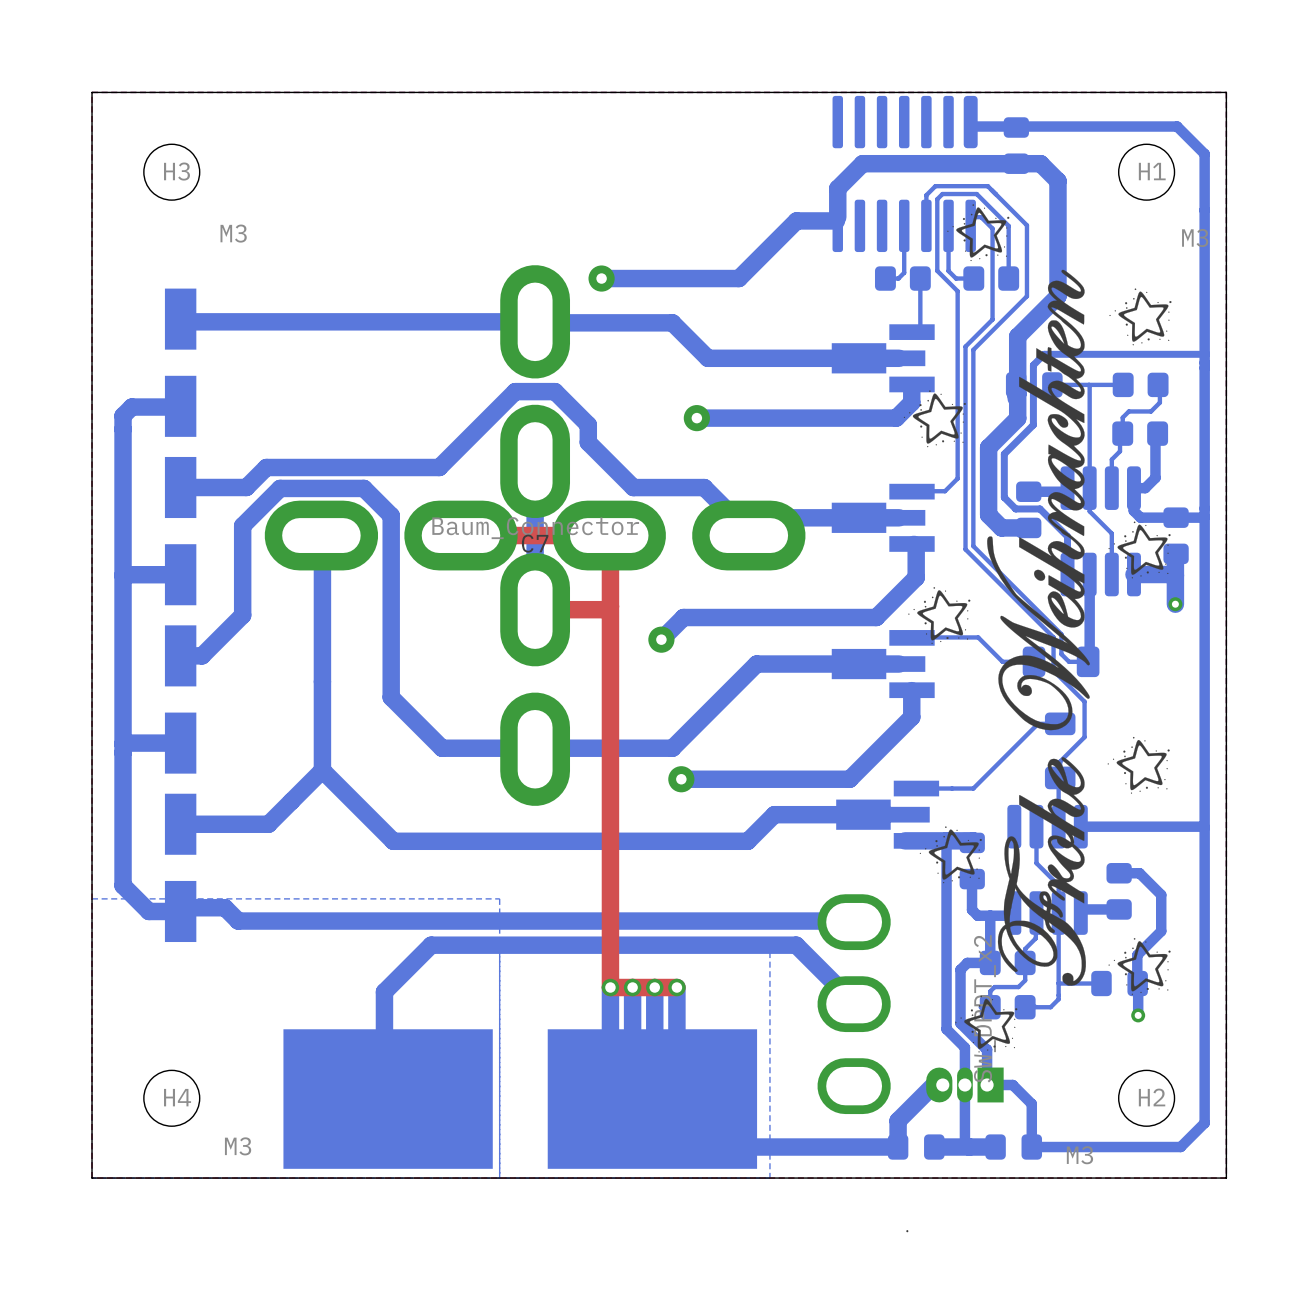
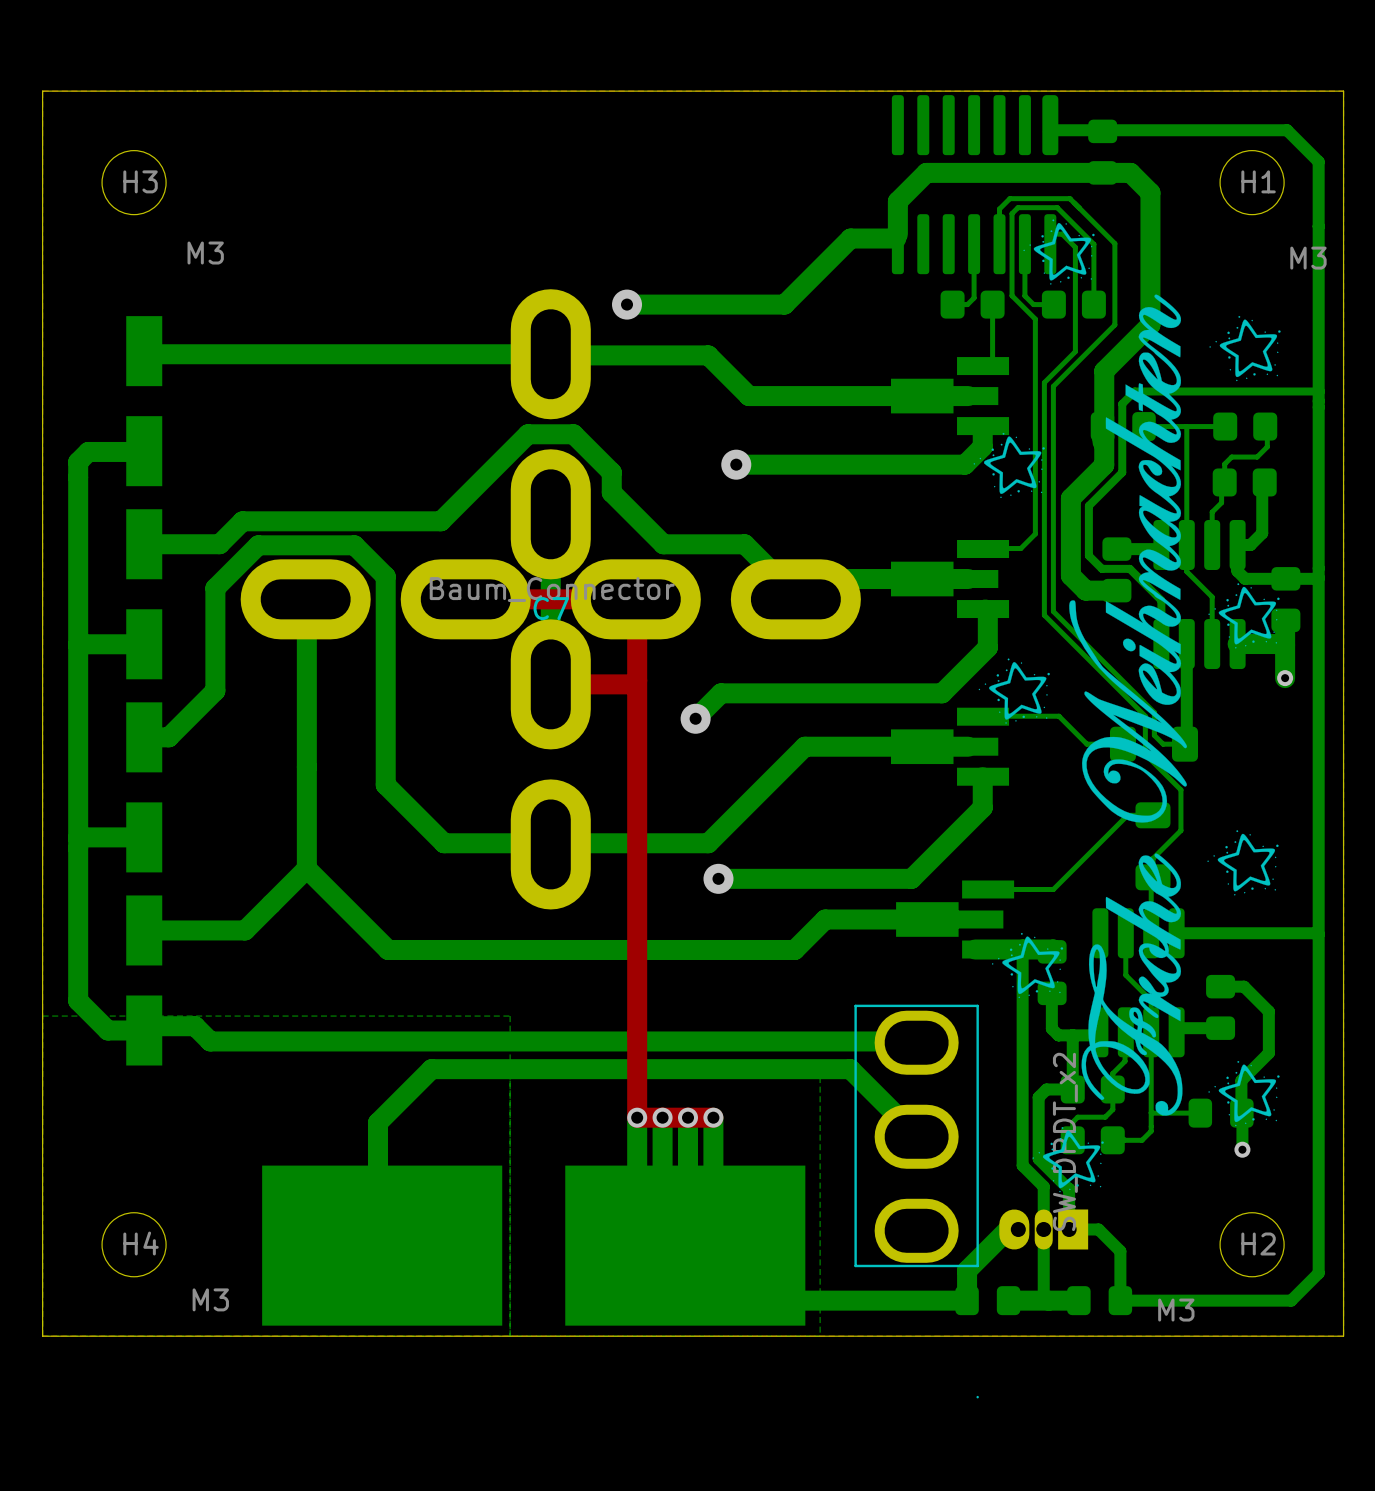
part footprint: [817, 894, 909, 1233] -> [854, 1004, 979, 1399]

